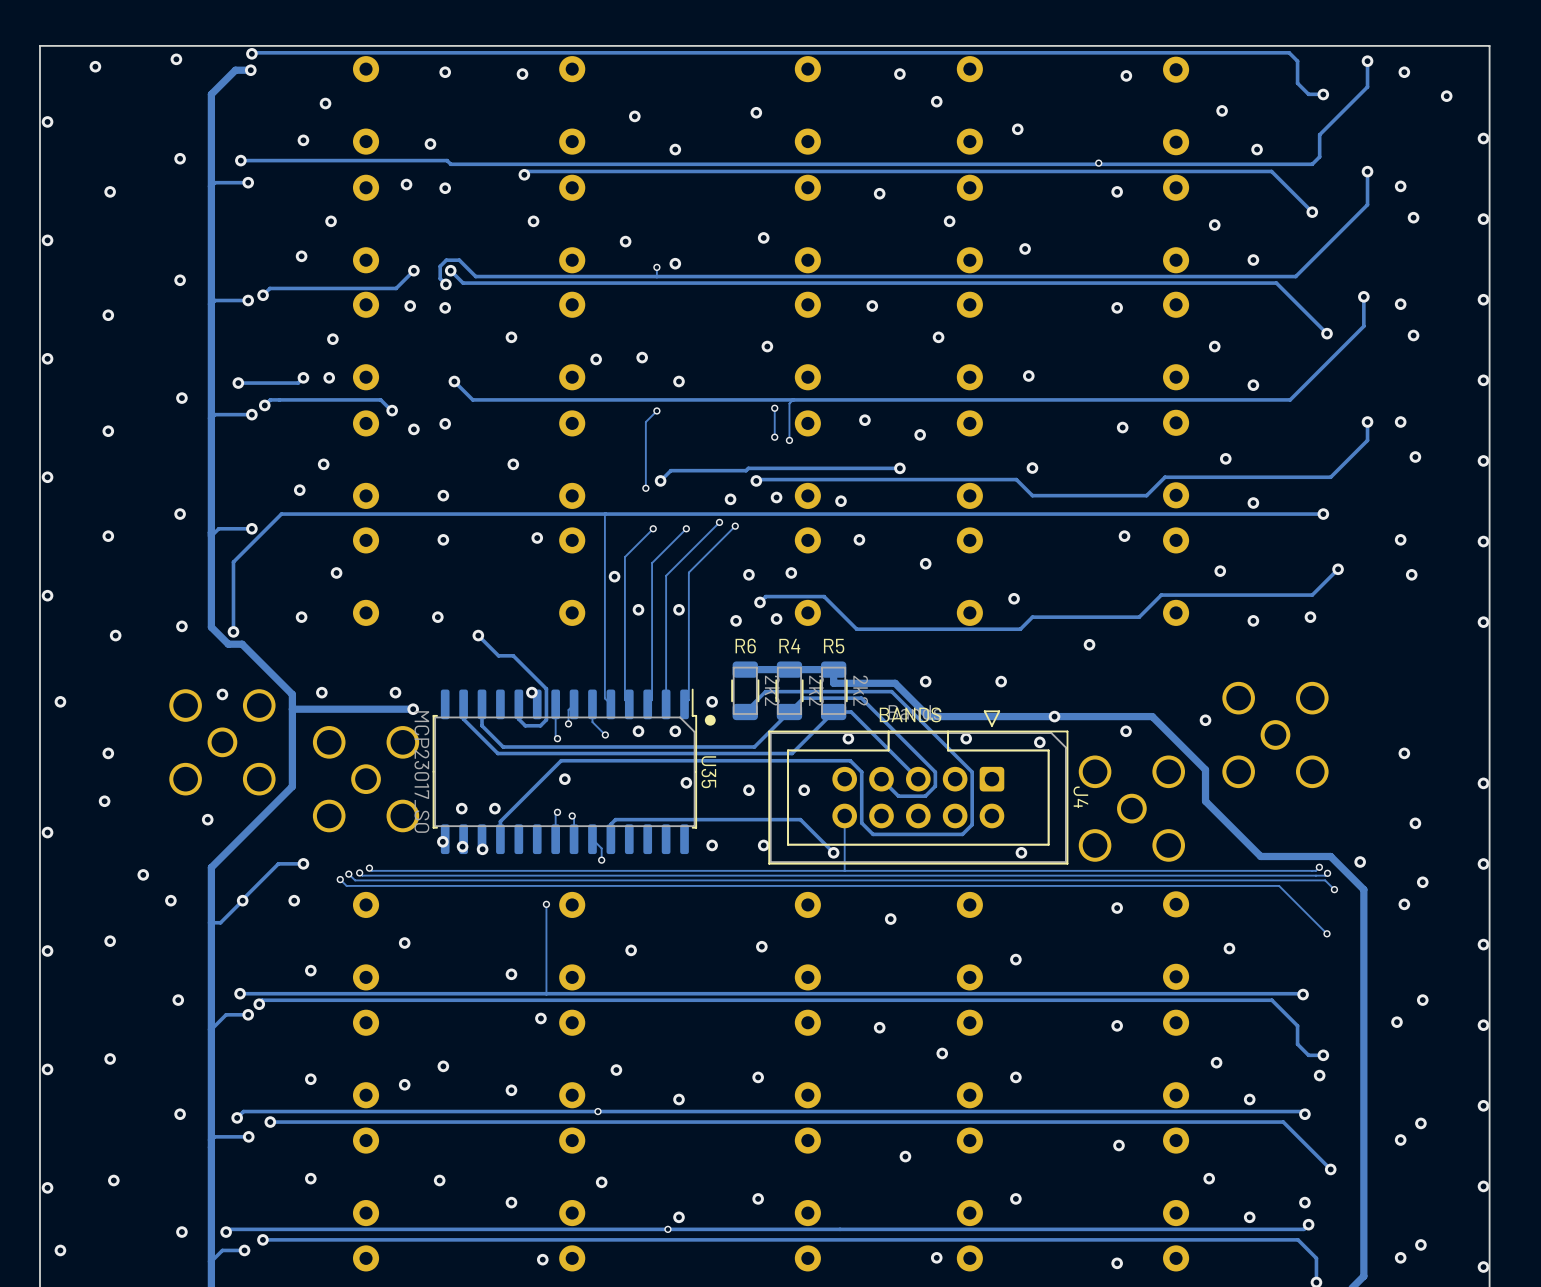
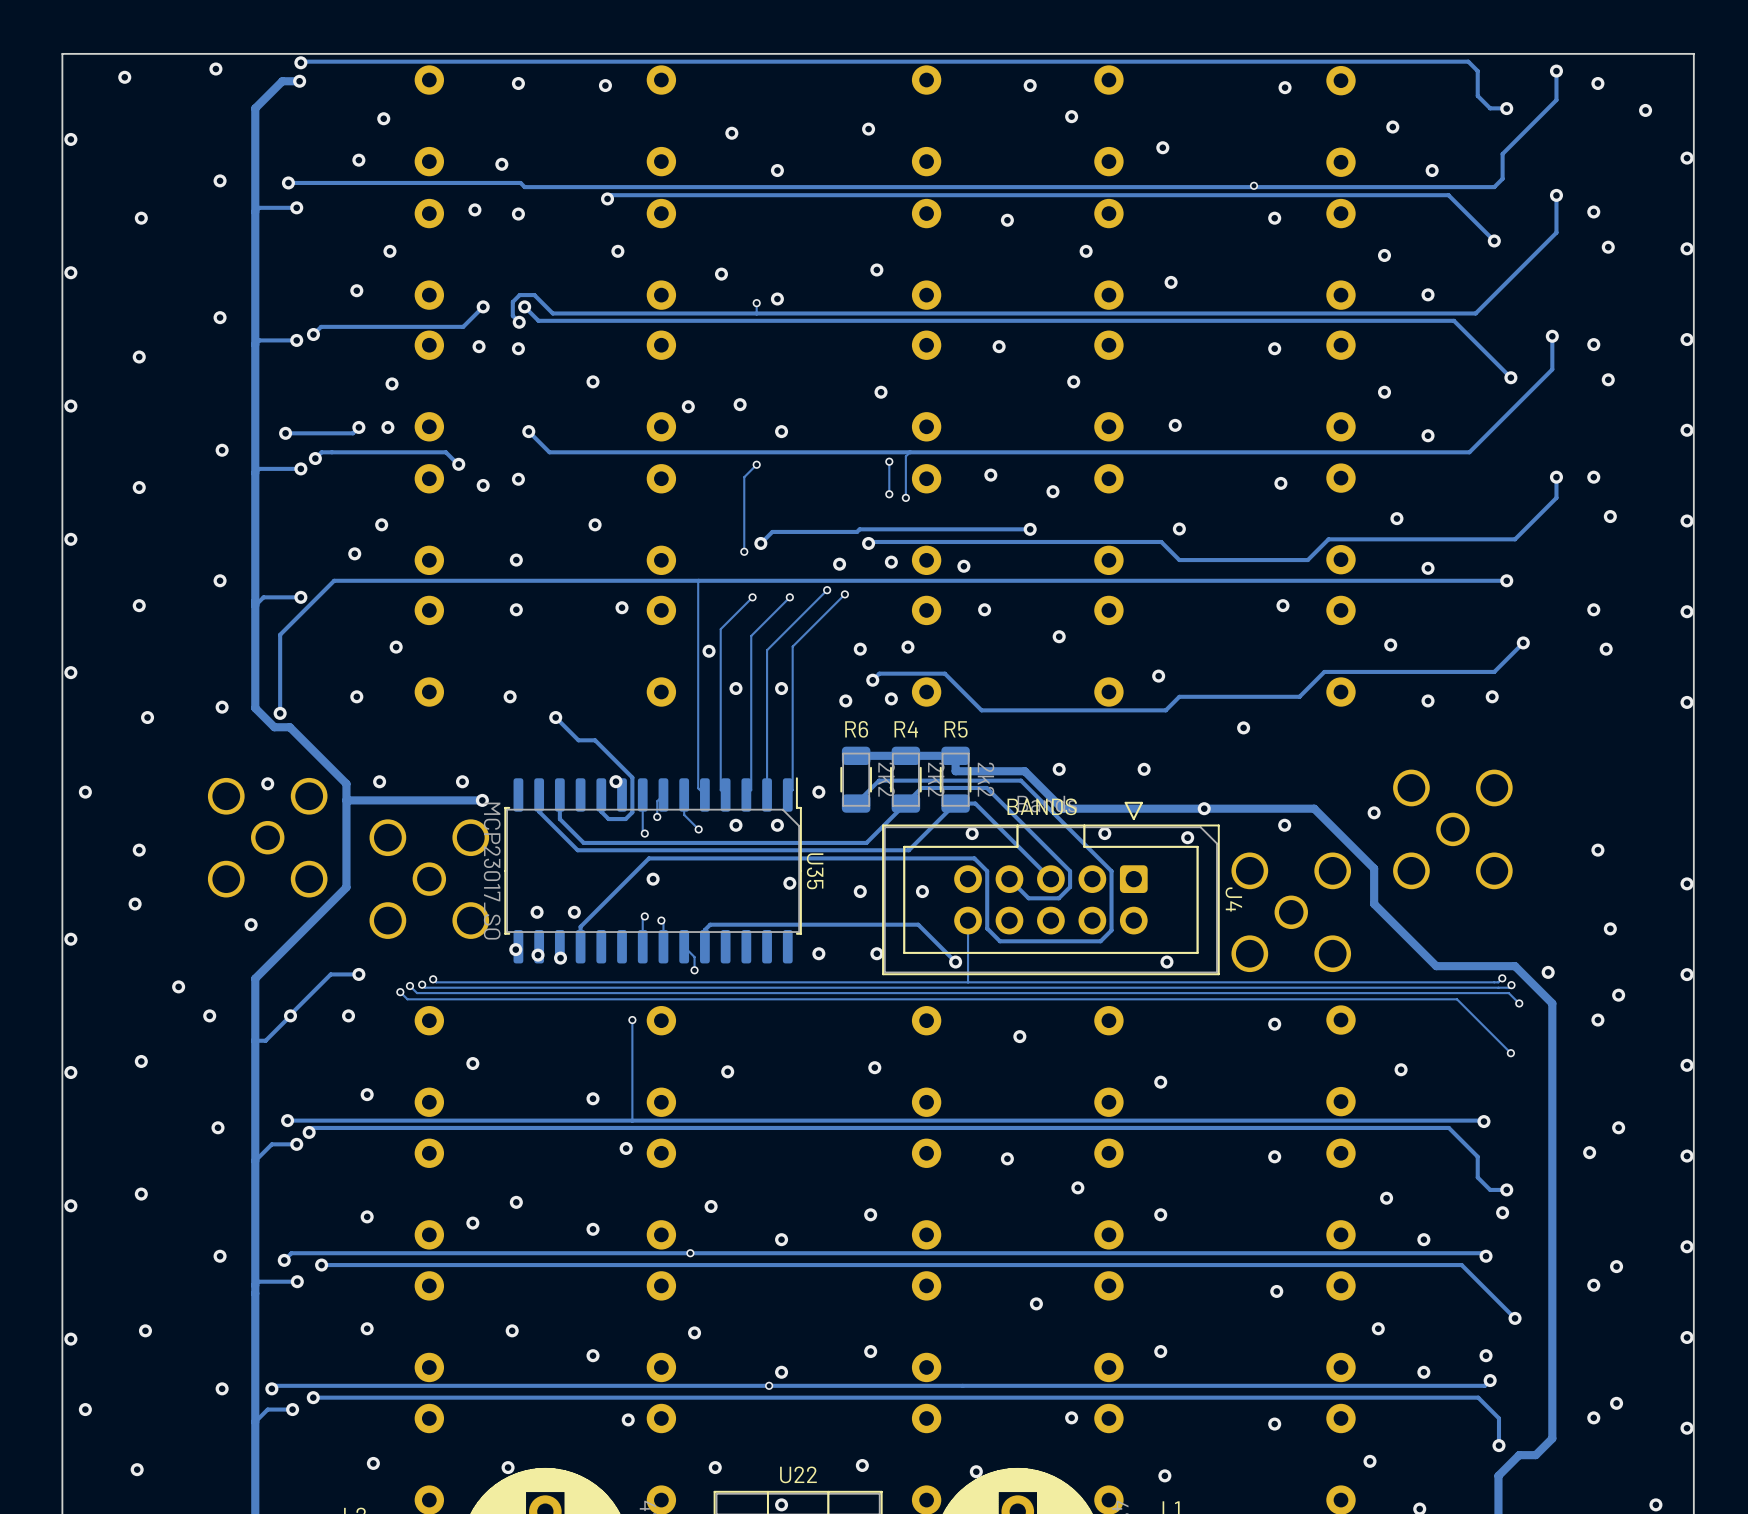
drawing: [704, 714, 716, 726] -> none

